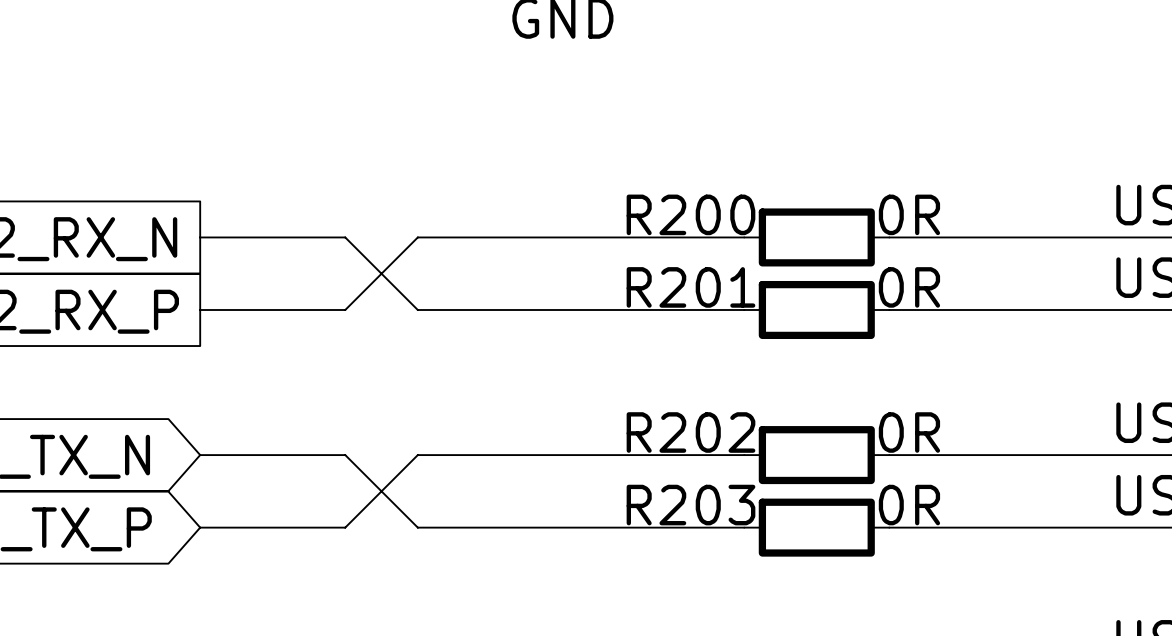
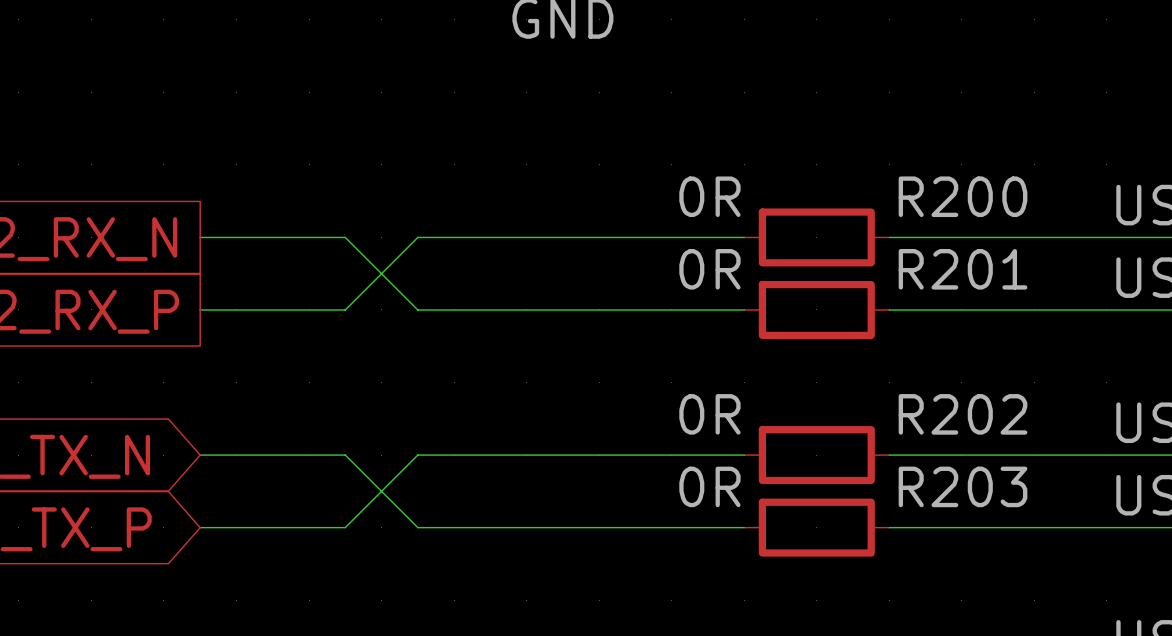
R200 name position: R200 (690, 214) -> R200 (963, 196)
R200 text position: 0R (909, 214) -> 0R (709, 196)
R201 name position: R201 (690, 287) -> R201 (963, 269)
R201 text position: 0R (909, 287) -> 0R (709, 269)
R202 name position: R202 (690, 432) -> R202 (963, 414)
R202 text position: 0R (909, 432) -> 0R (709, 414)
R203 name position: R203 (690, 505) -> R203 (963, 486)
R203 text position: 0R (909, 505) -> 0R (709, 486)

